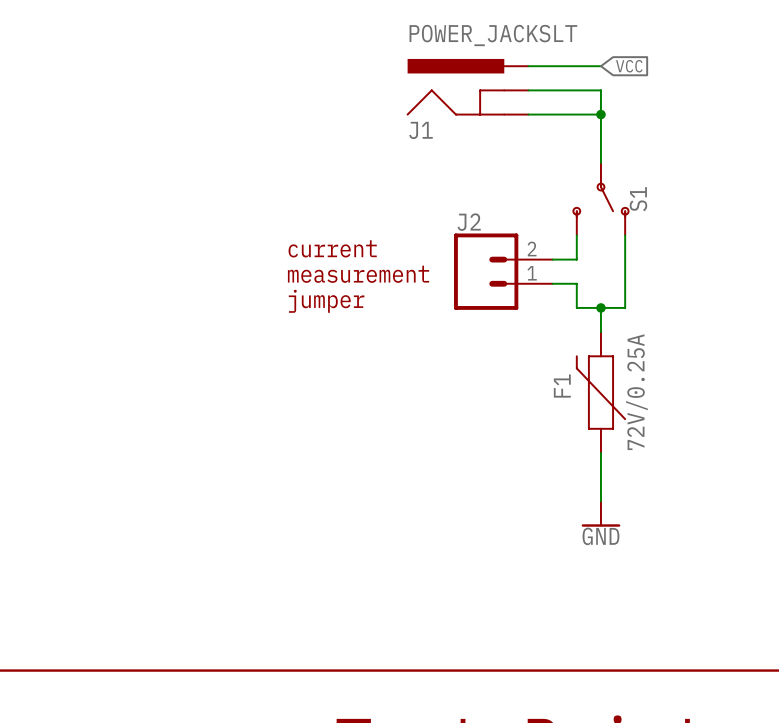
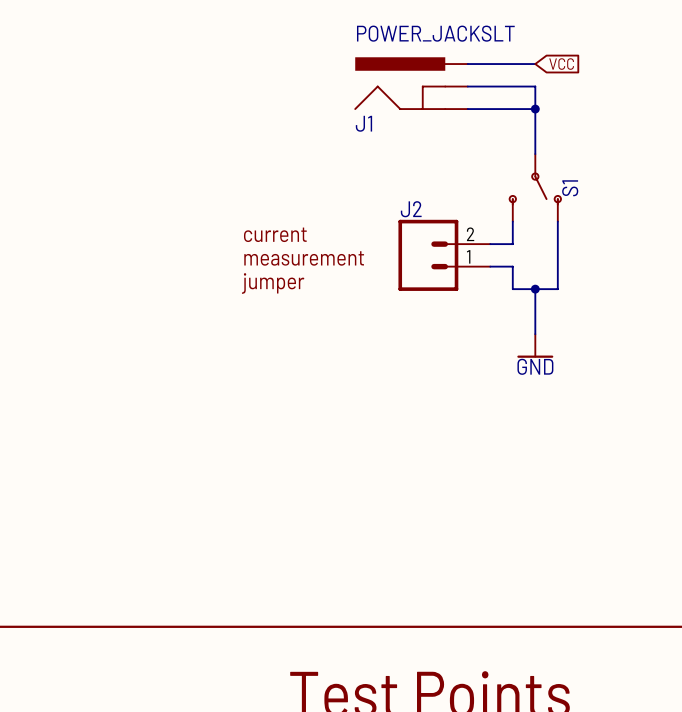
F1: 72V/0.25A (600, 392) -> none
wire: (600, 452) (600, 501) -> none
power symbol position: GND (600, 514) -> GND (535, 345)

